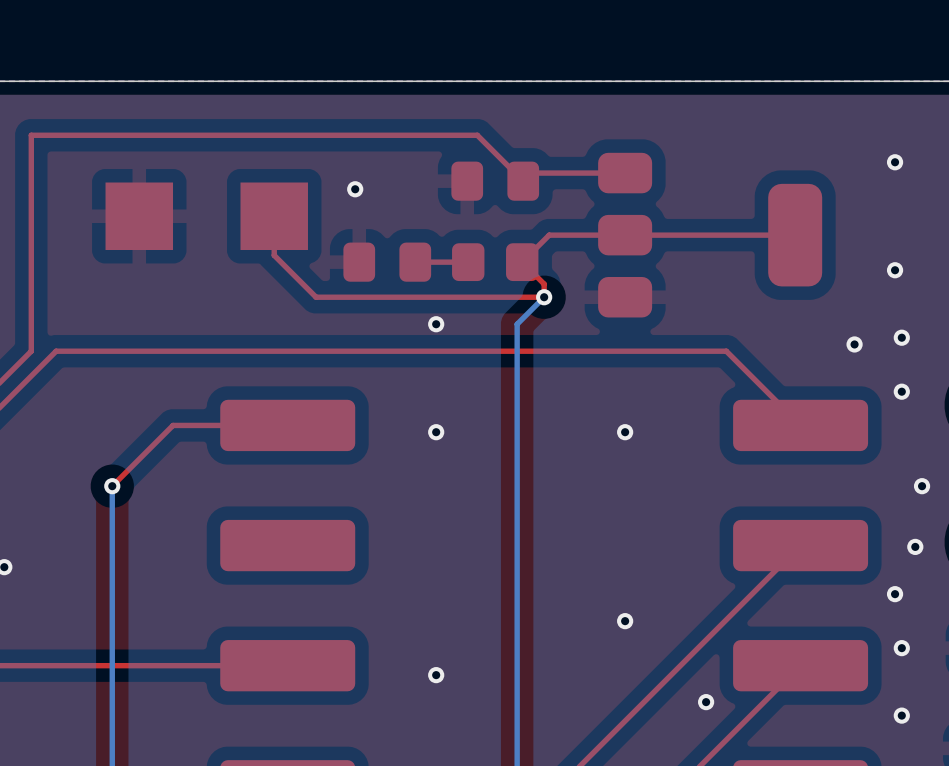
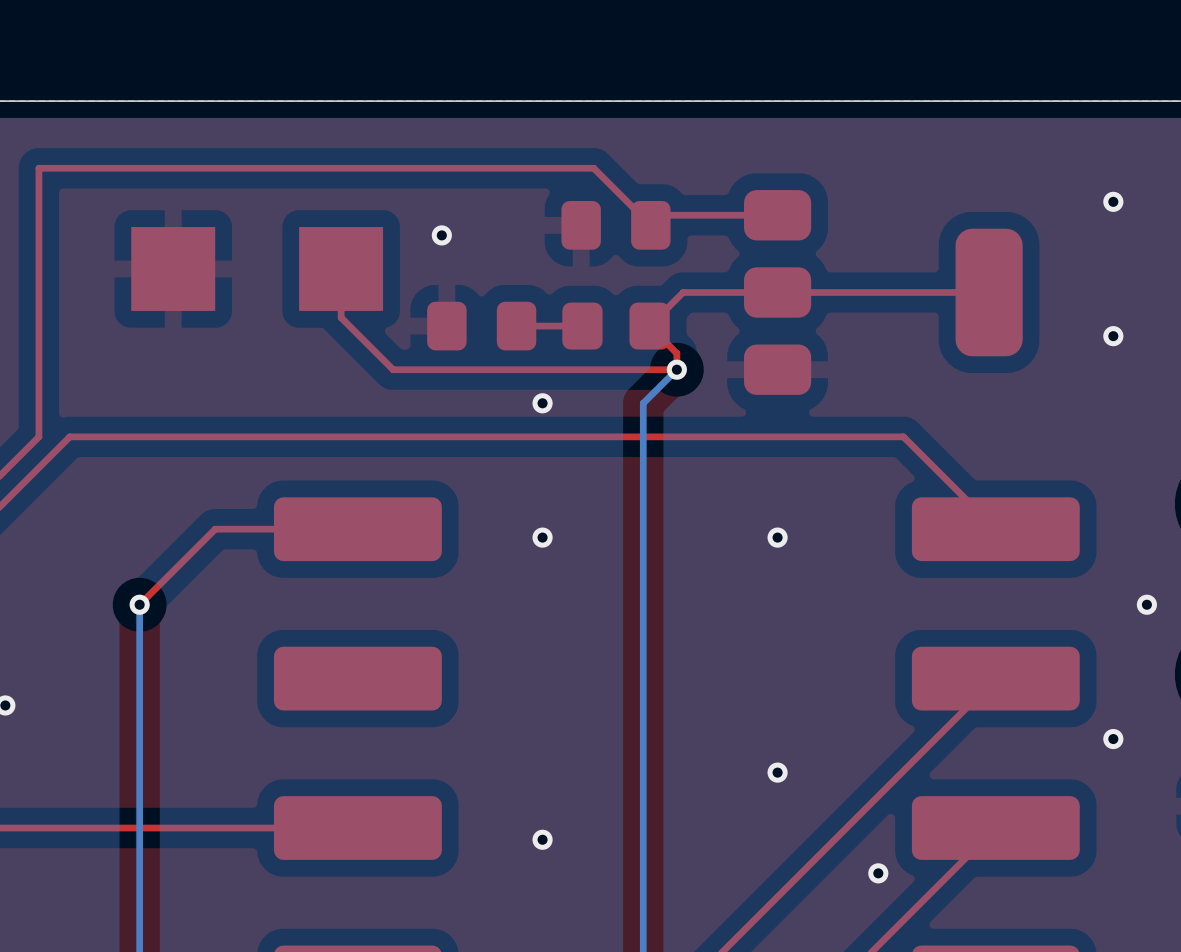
via: (901, 337) -> none
via: (854, 344) -> none
via: (901, 391) -> none
via: (915, 546) -> none
via: (901, 648) -> none
via: (901, 715) -> none

